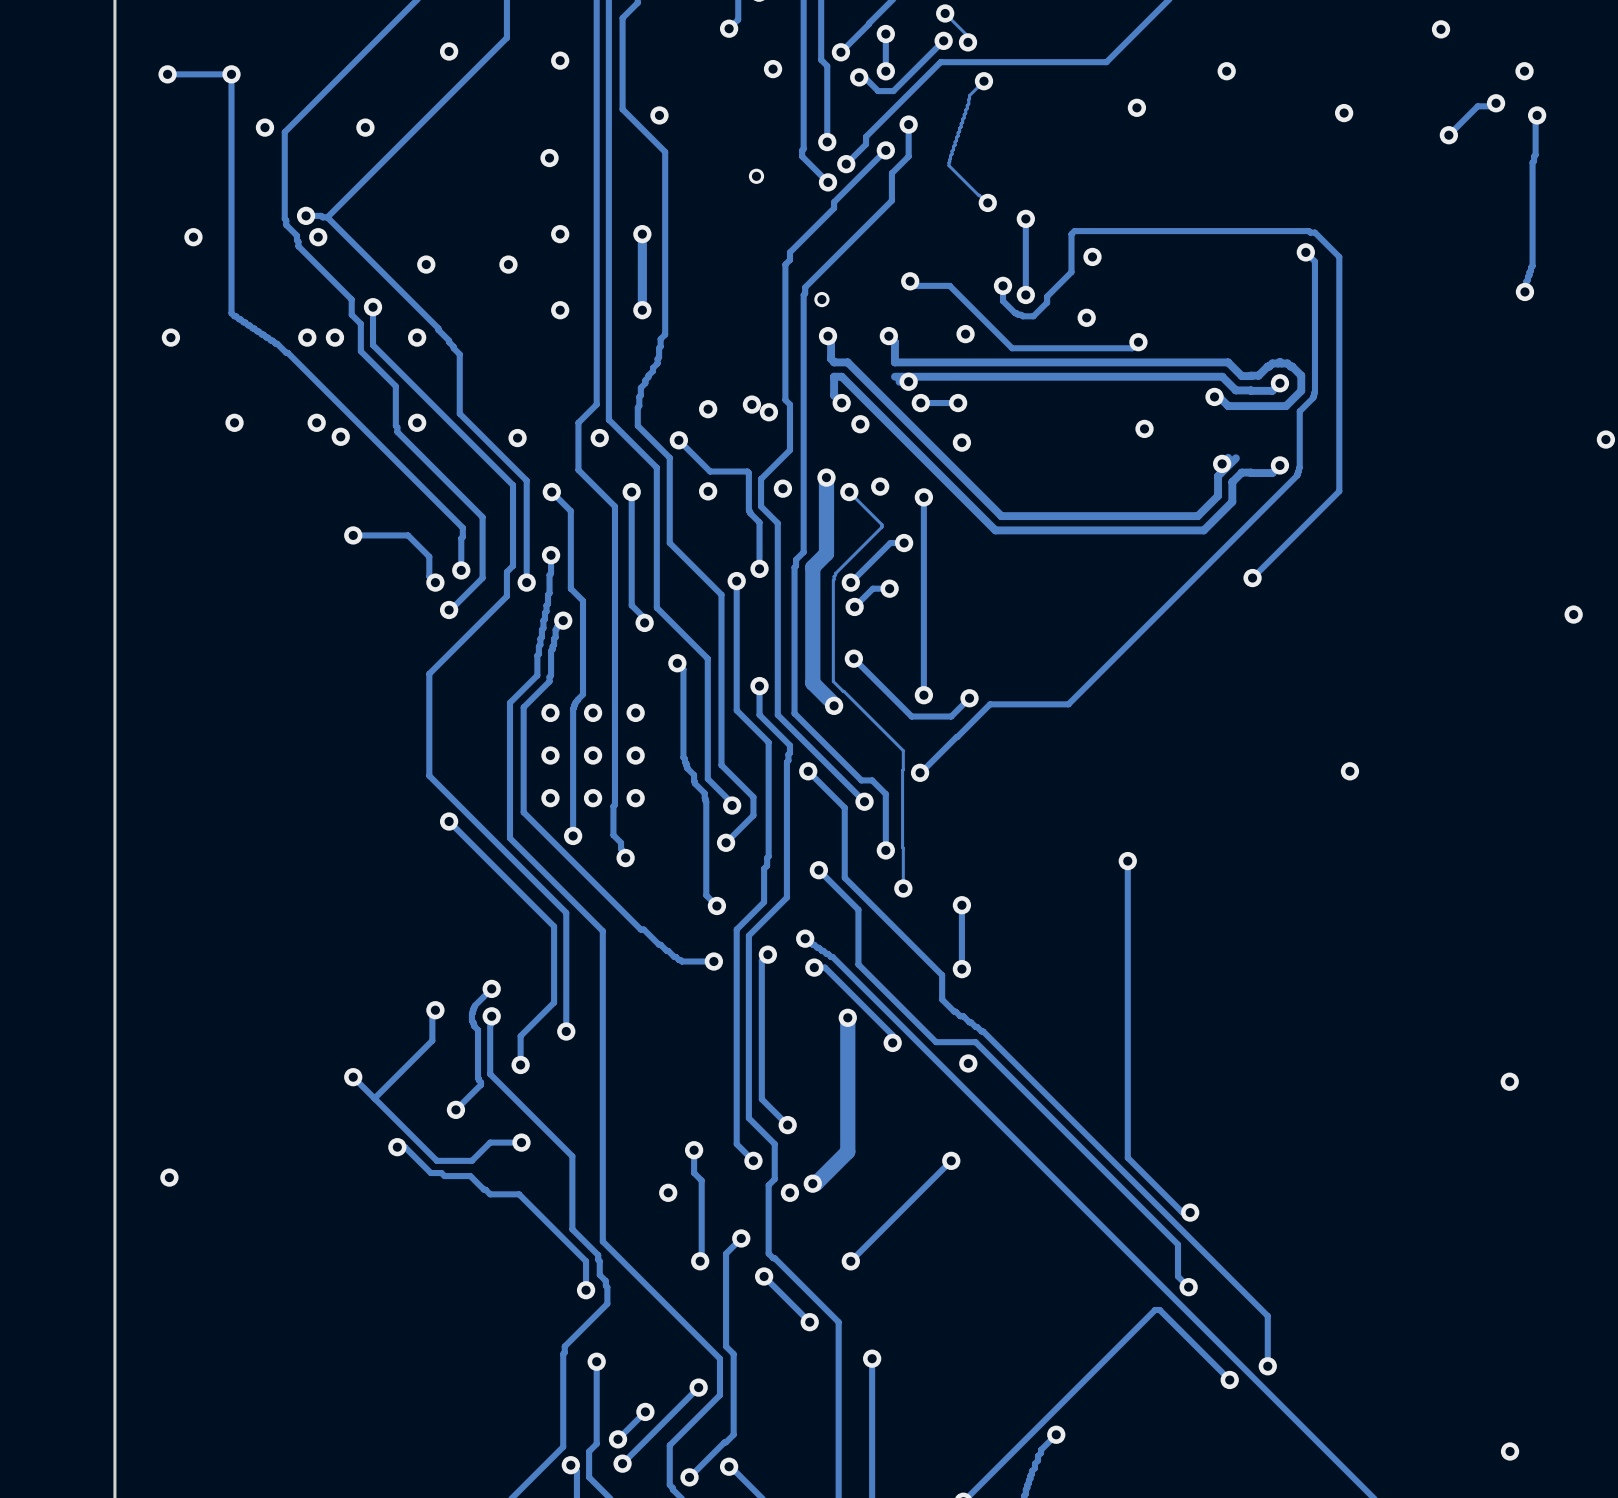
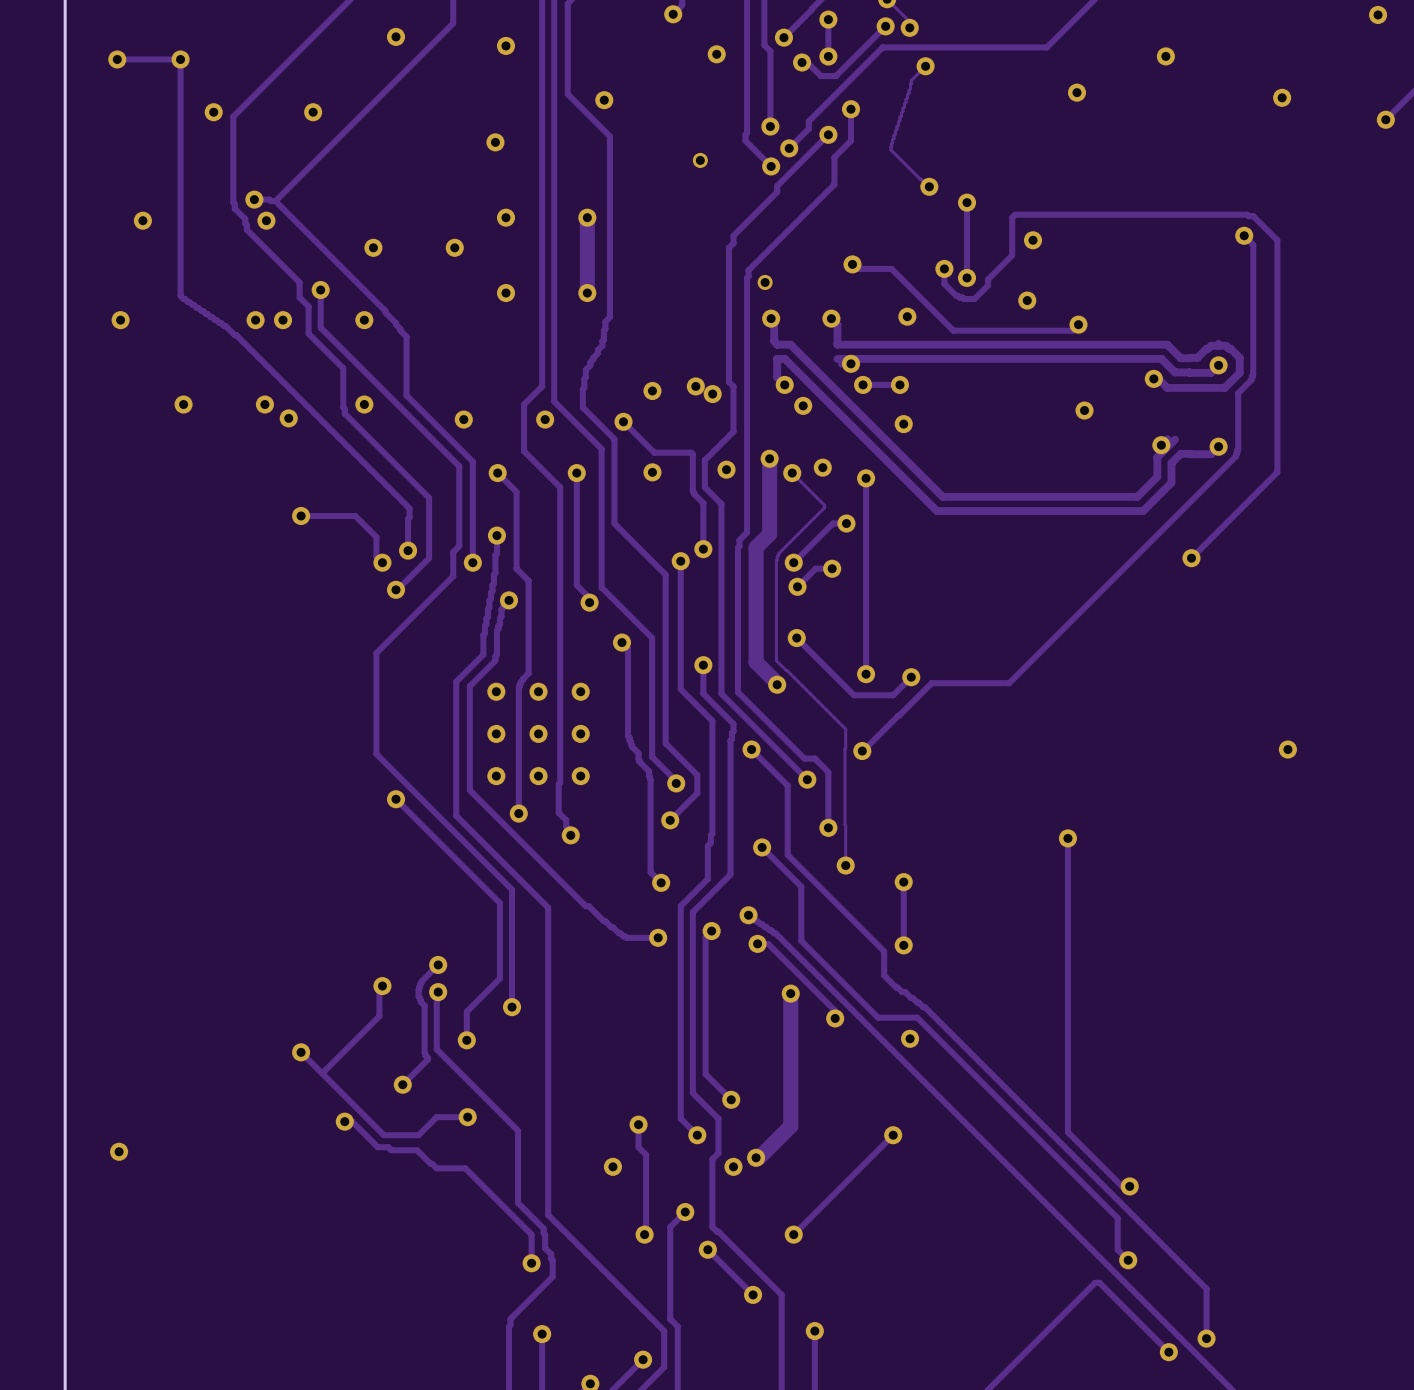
track width: thin (642, 234) (642, 310) -> thick (587, 217) (587, 293)

